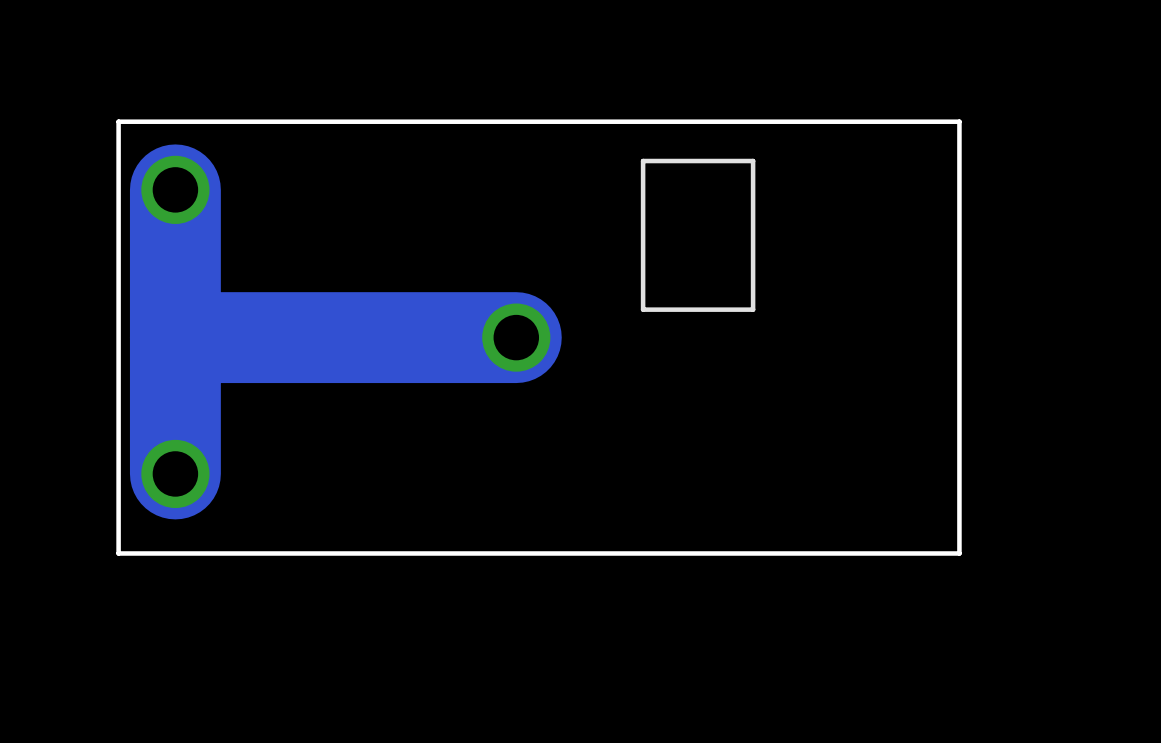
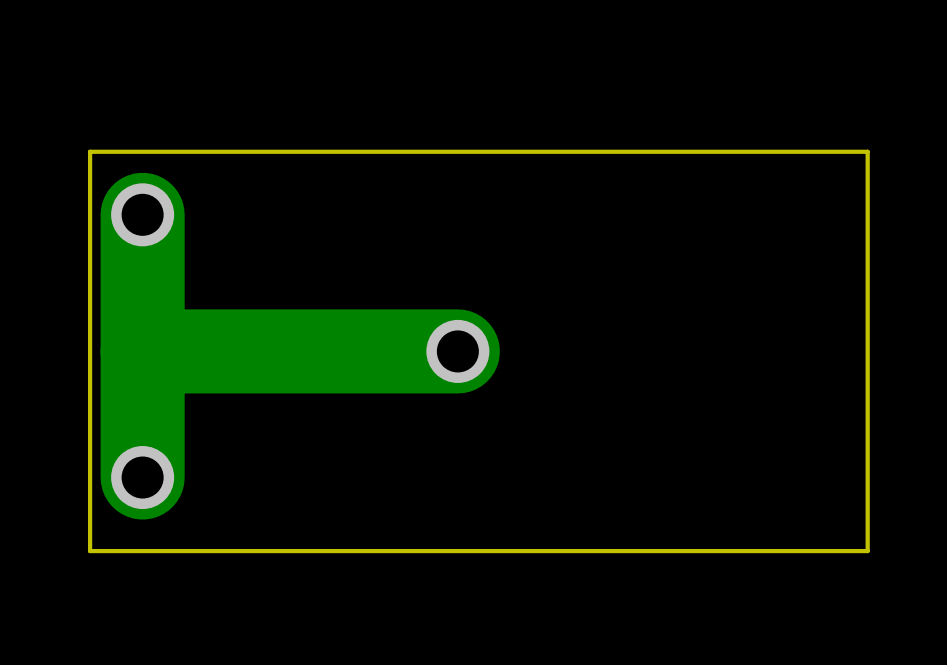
part: (698, 235) -> none

